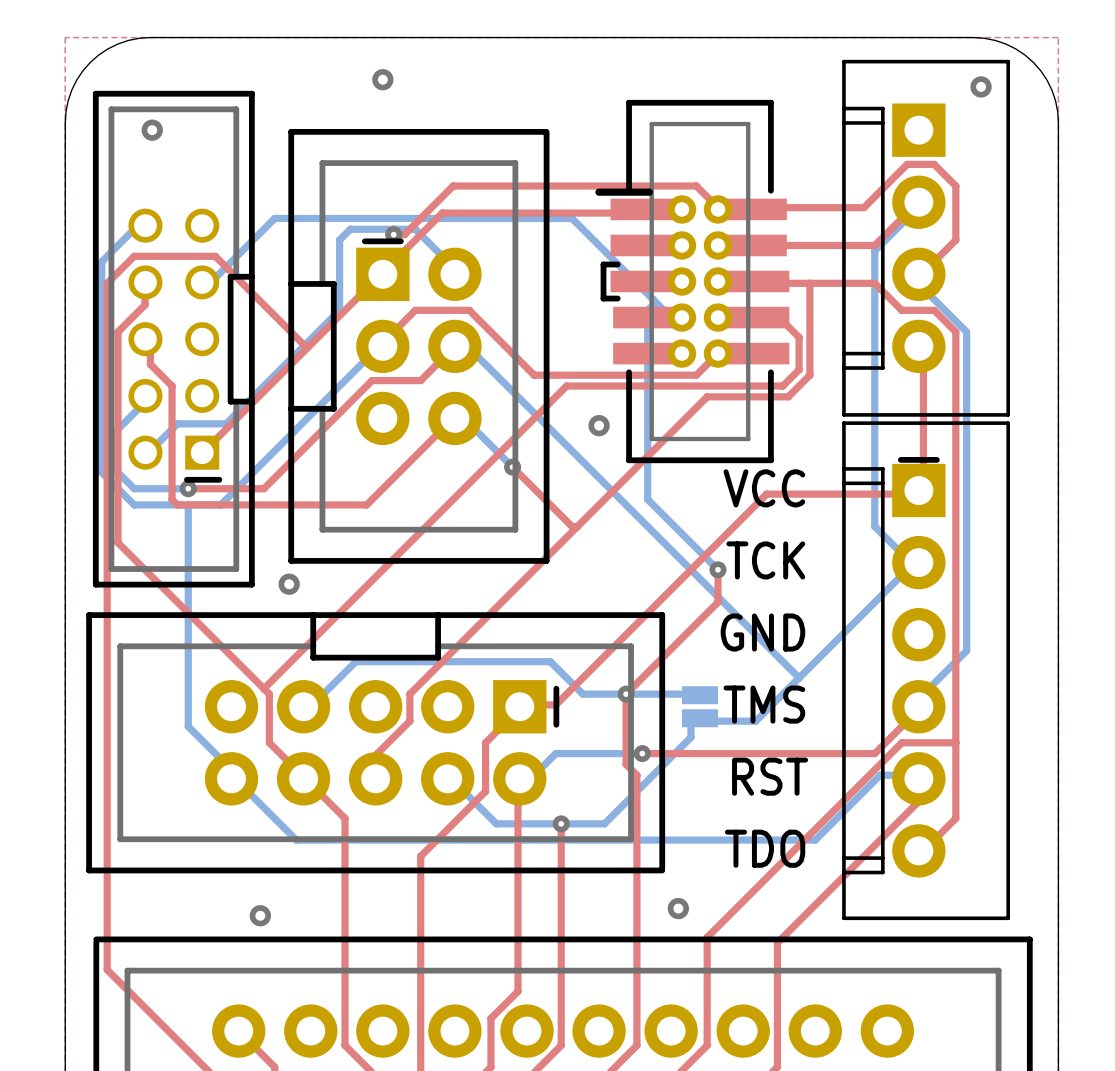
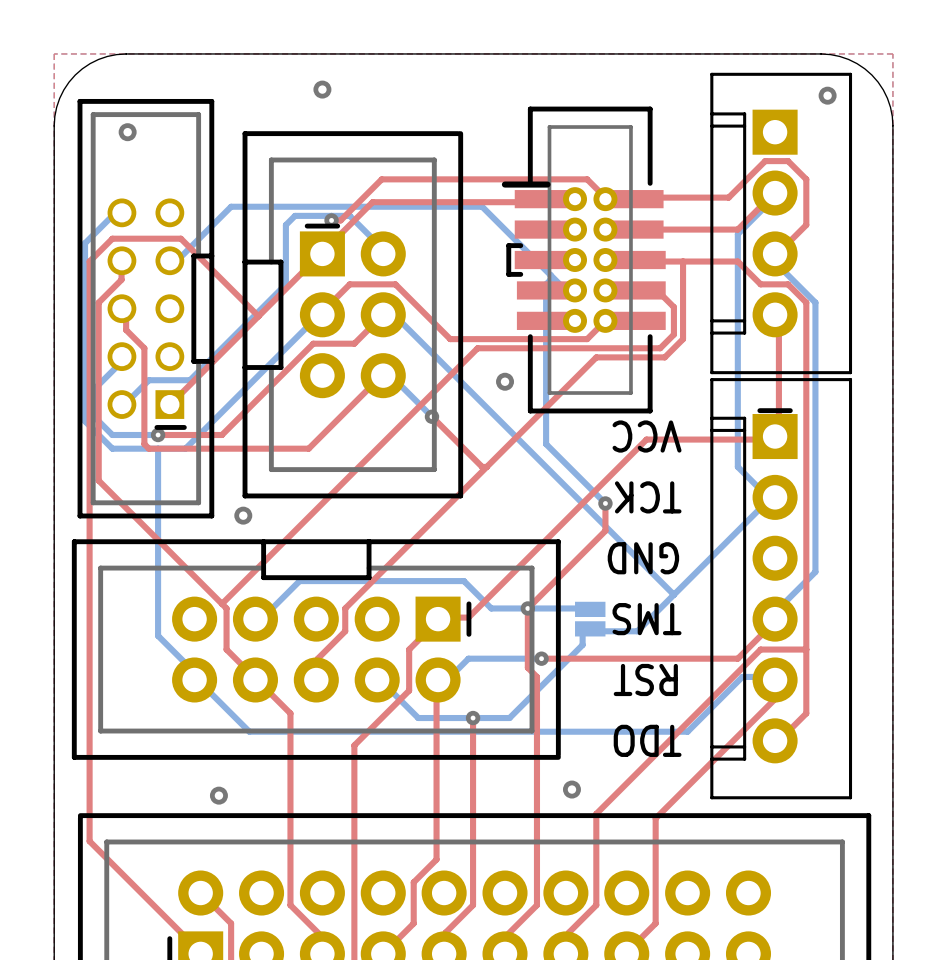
text rotation: 0° (764, 488) -> 180° (647, 436)
text rotation: 0° (765, 560) -> 180° (648, 497)
text rotation: 0° (762, 632) -> 180° (643, 558)
text rotation: 0° (764, 704) -> 180° (647, 619)
text rotation: 0° (770, 776) -> 180° (645, 679)
text rotation: 0° (765, 848) -> 180° (647, 740)

